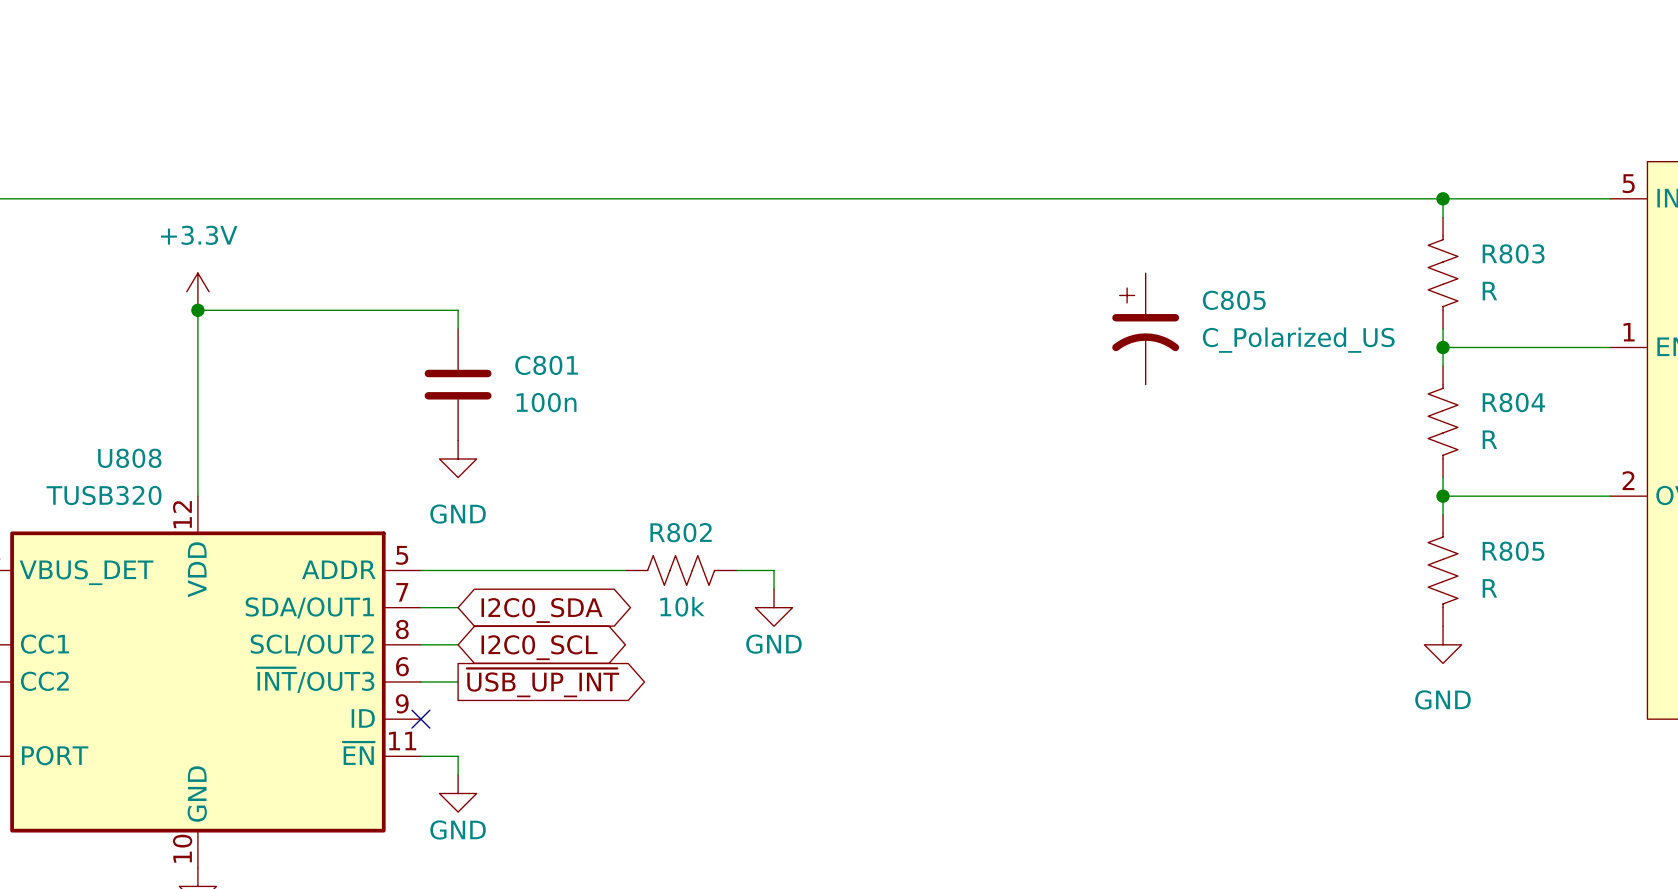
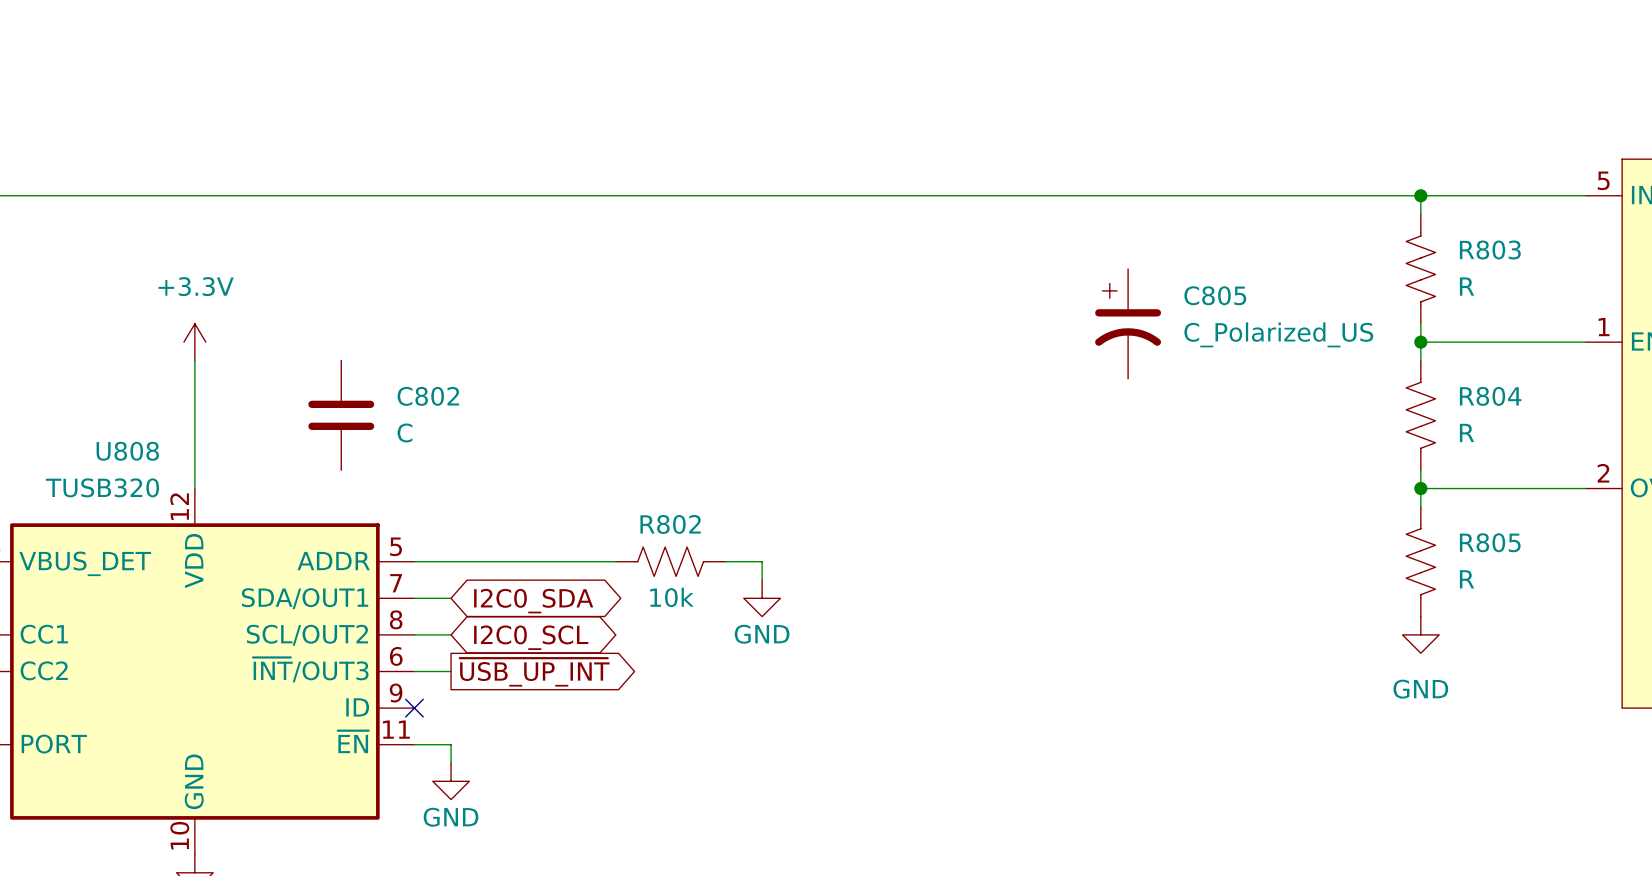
power symbol position: +3.3V (197, 291) -> +3.3V (194, 342)
junction: (197, 310) -> none
wire: (458, 328) (458, 310) (197, 310) (197, 366) -> none
C801: 100n (458, 384) -> none
C802: none -> C (341, 415)
power symbol: GND (458, 458) -> none

